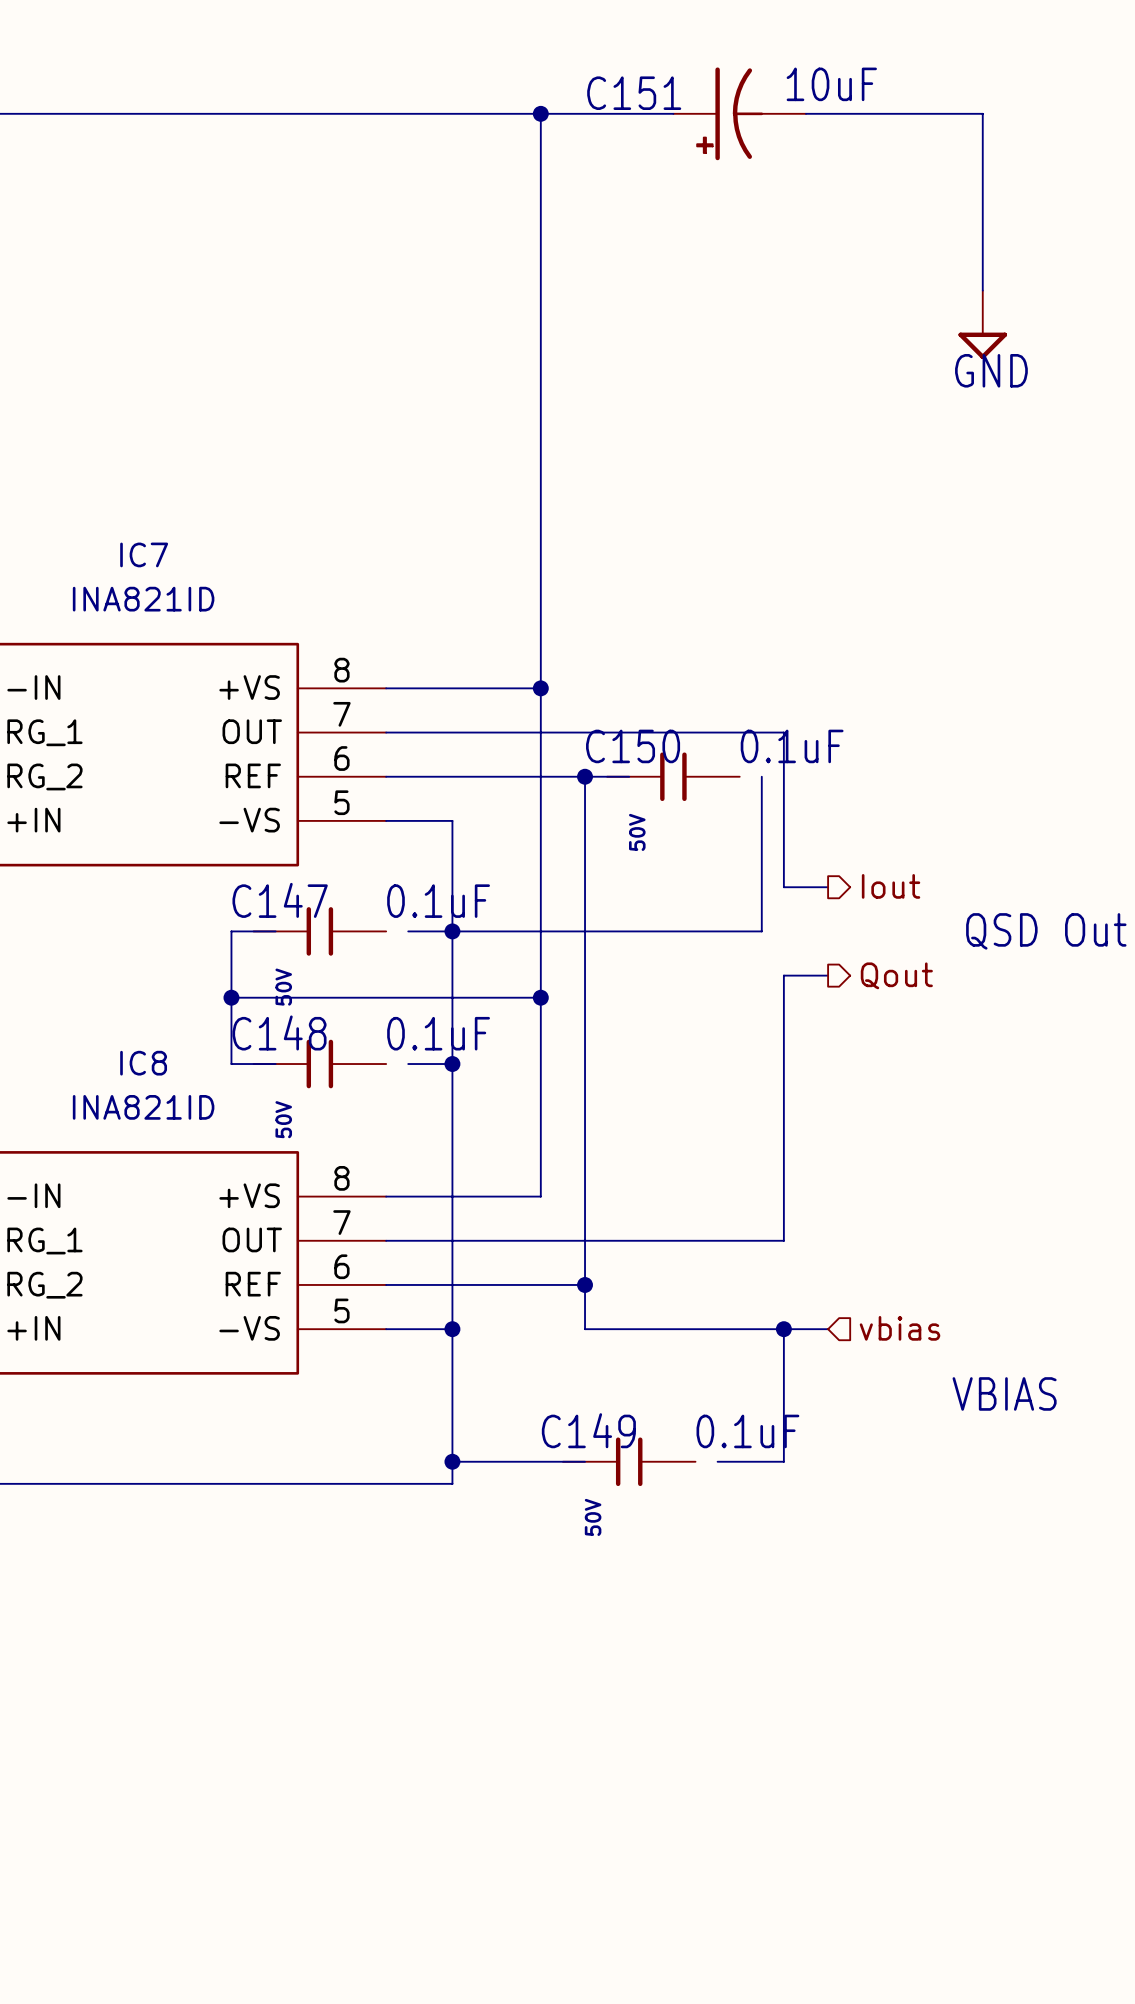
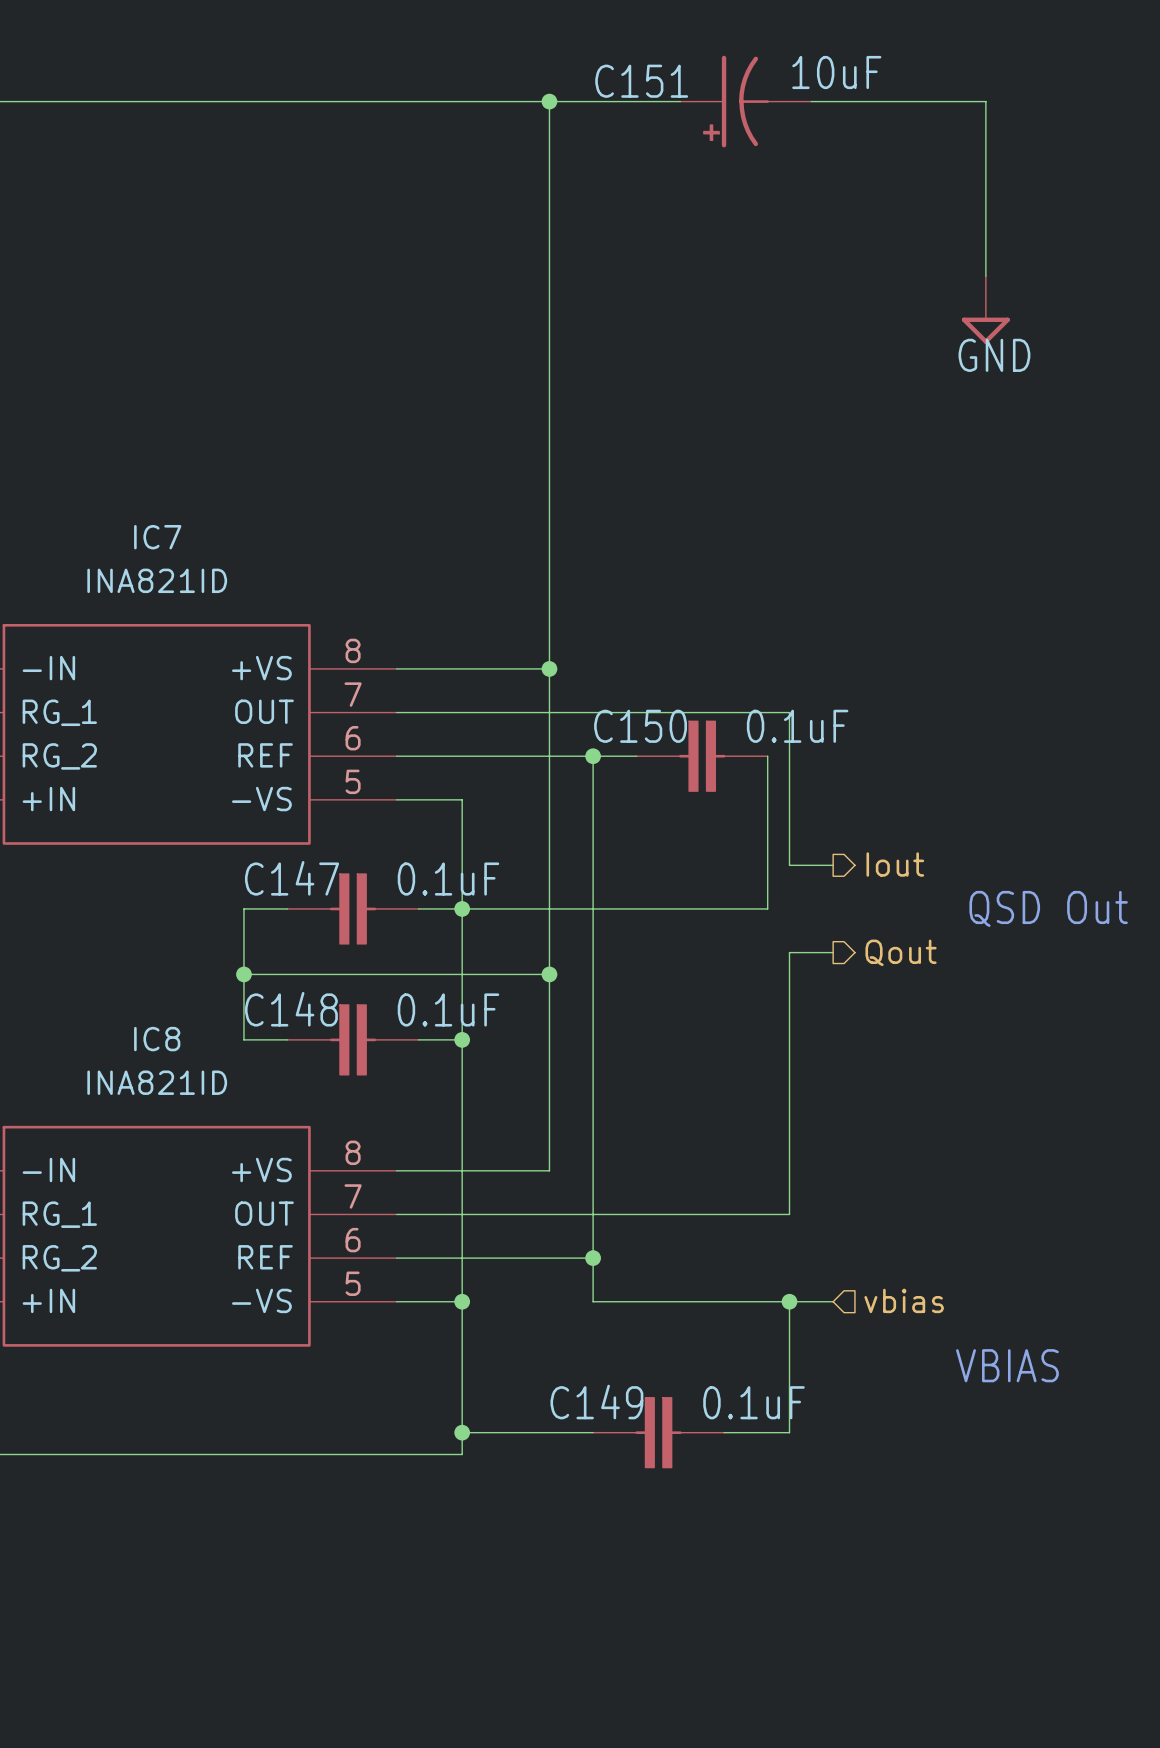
C150 symbol: [607, 752, 740, 802] -> [636, 721, 768, 792]
C150 text: 50V (637, 832) -> none
C147 symbol: [253, 907, 387, 956] -> [287, 874, 419, 944]
C147 text: 50V (283, 987) -> none
C148 symbol: [253, 1039, 387, 1089] -> [287, 1004, 419, 1075]
C148 text: 50V (283, 1119) -> none
C149 symbol: [562, 1437, 696, 1487] -> [593, 1397, 725, 1468]
C149 text: 50V (593, 1517) -> none

